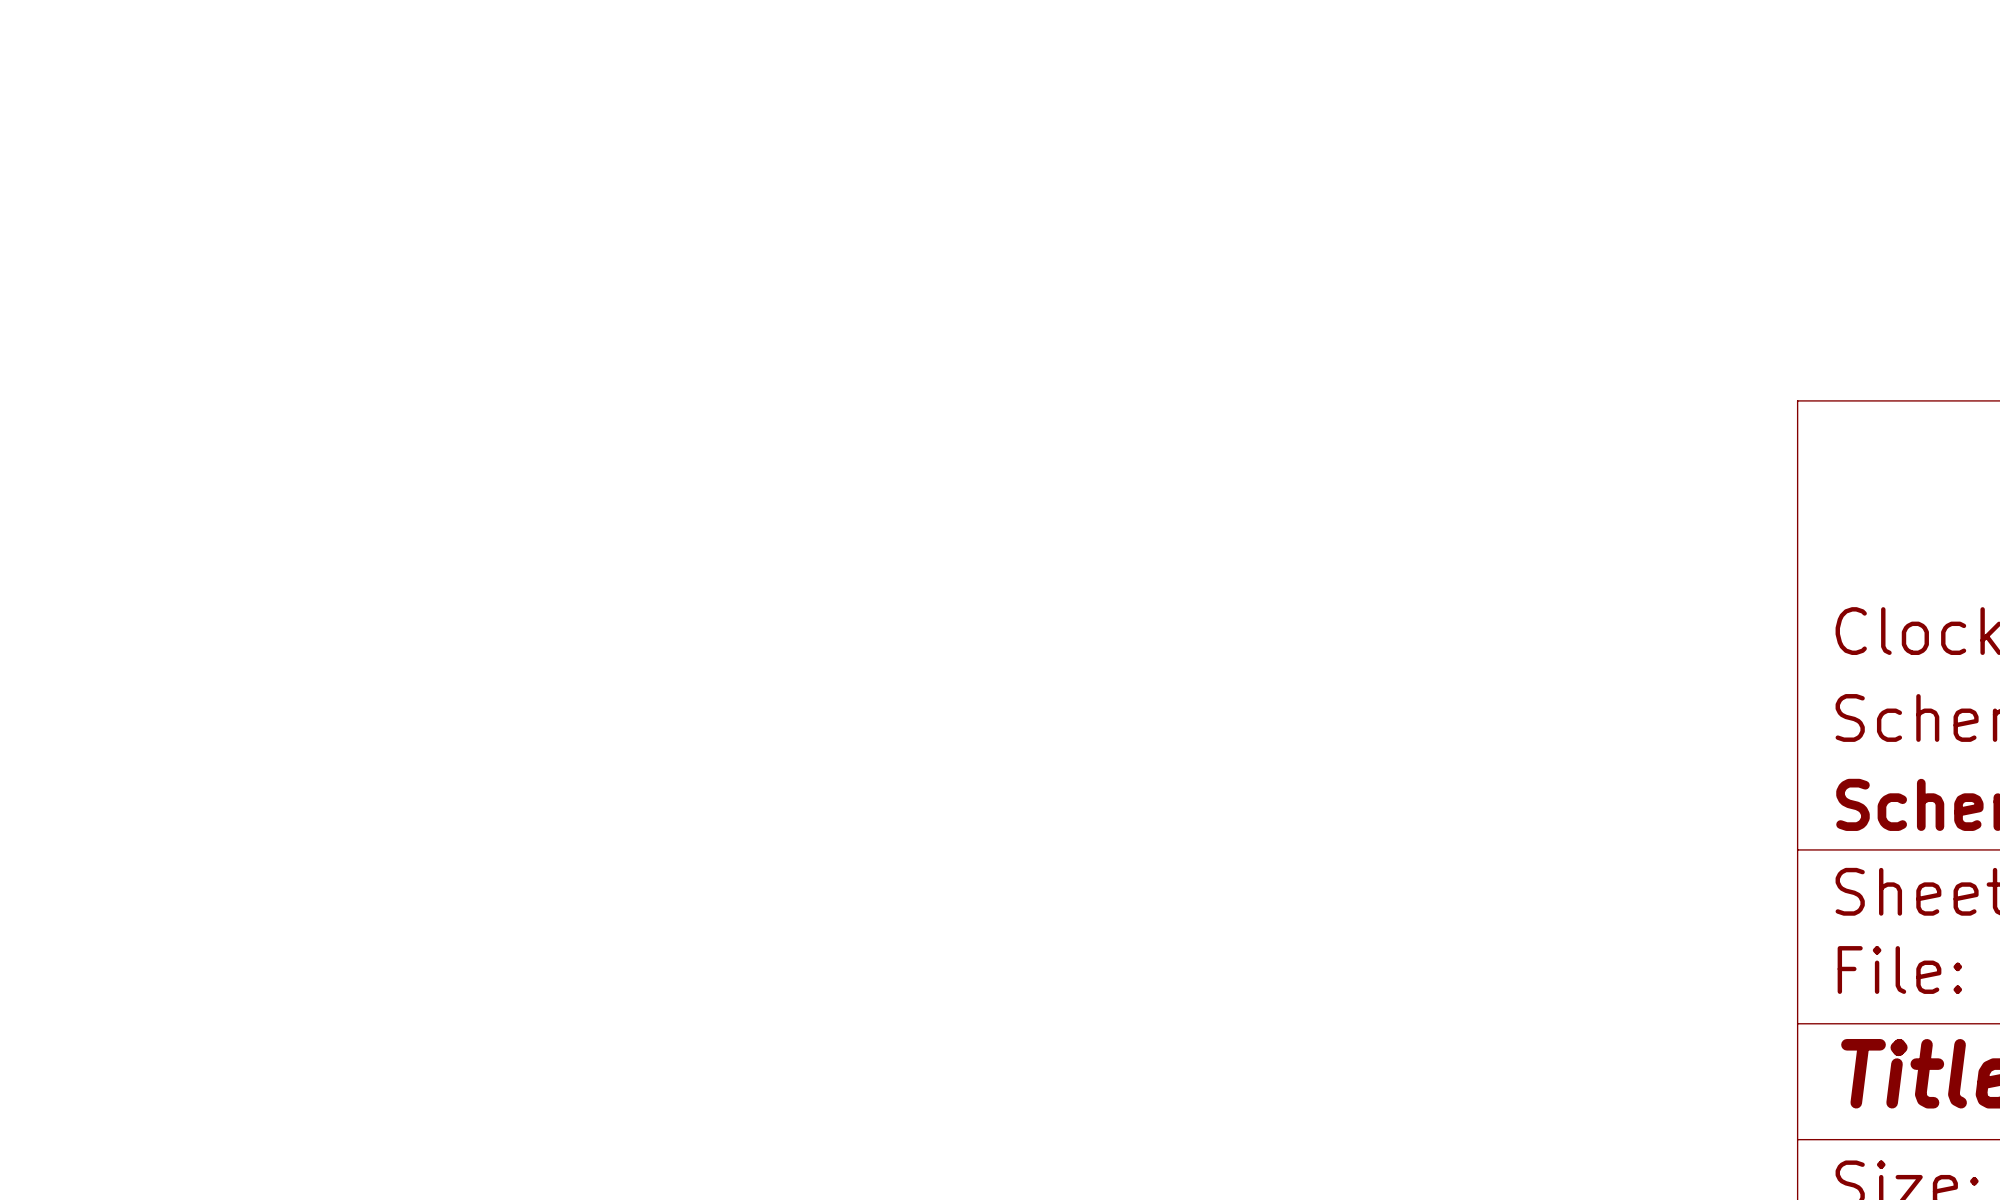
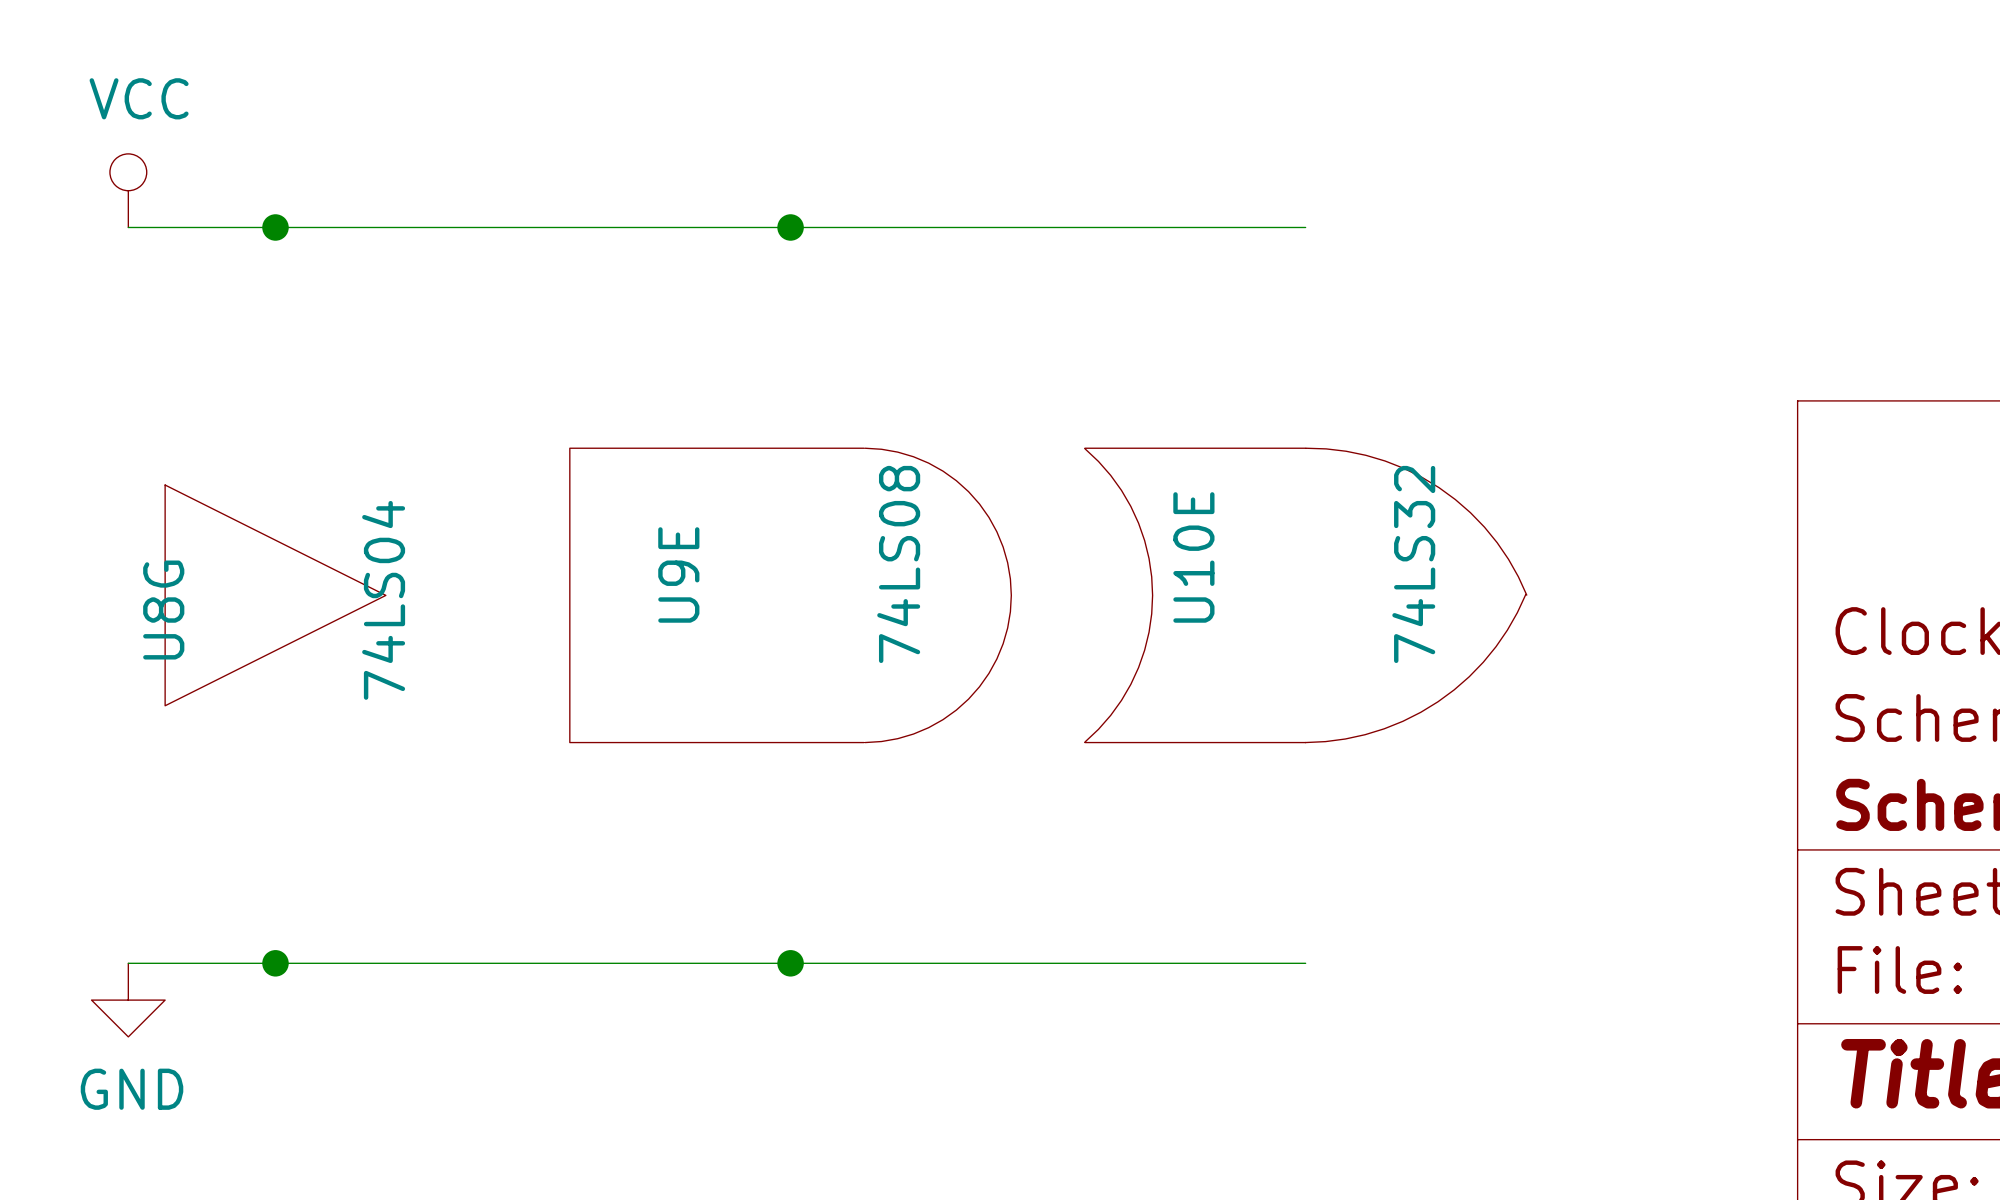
power symbol: none -> VCC (128, 190)
wire: none -> (128, 227) (1305, 227)
junction: none -> (275, 227)
junction: none -> (790, 227)
U8G: none -> 74LS04 (275, 595)
U9E: none -> 74LS08 (790, 595)
U10E: none -> 74LS32 (1305, 595)
wire: none -> (128, 963) (1305, 963)
junction: none -> (275, 963)
junction: none -> (790, 963)
power symbol: none -> GND (128, 1000)

